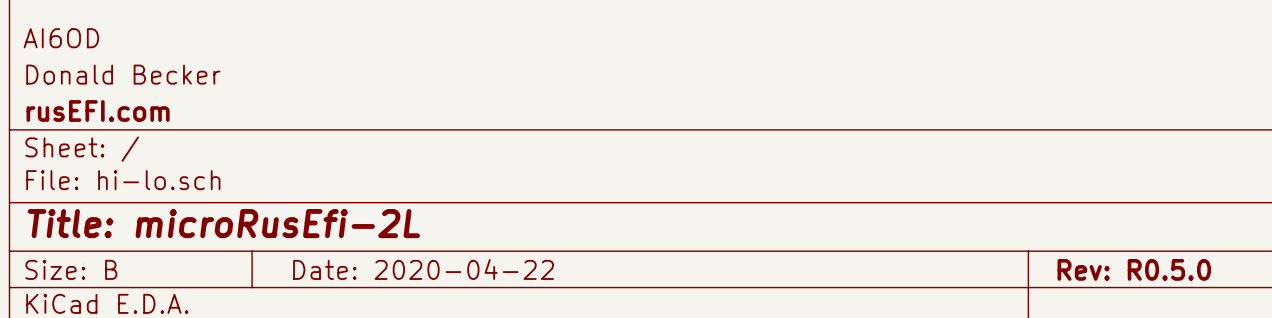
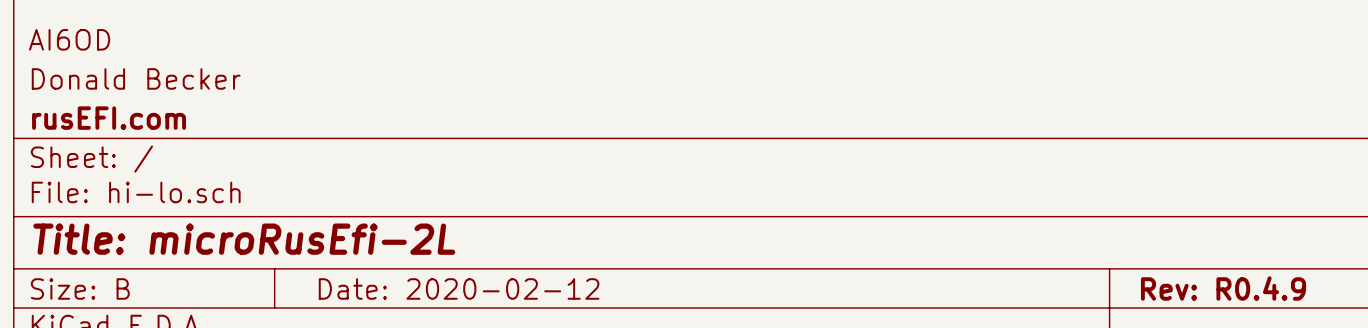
title block: Date: 2020-04-22 (423, 269) -> Date: 2020-02-12 (459, 288)
title block: Rev: R0.5.0 (1134, 269) -> Rev: R0.4.9 (1223, 288)

